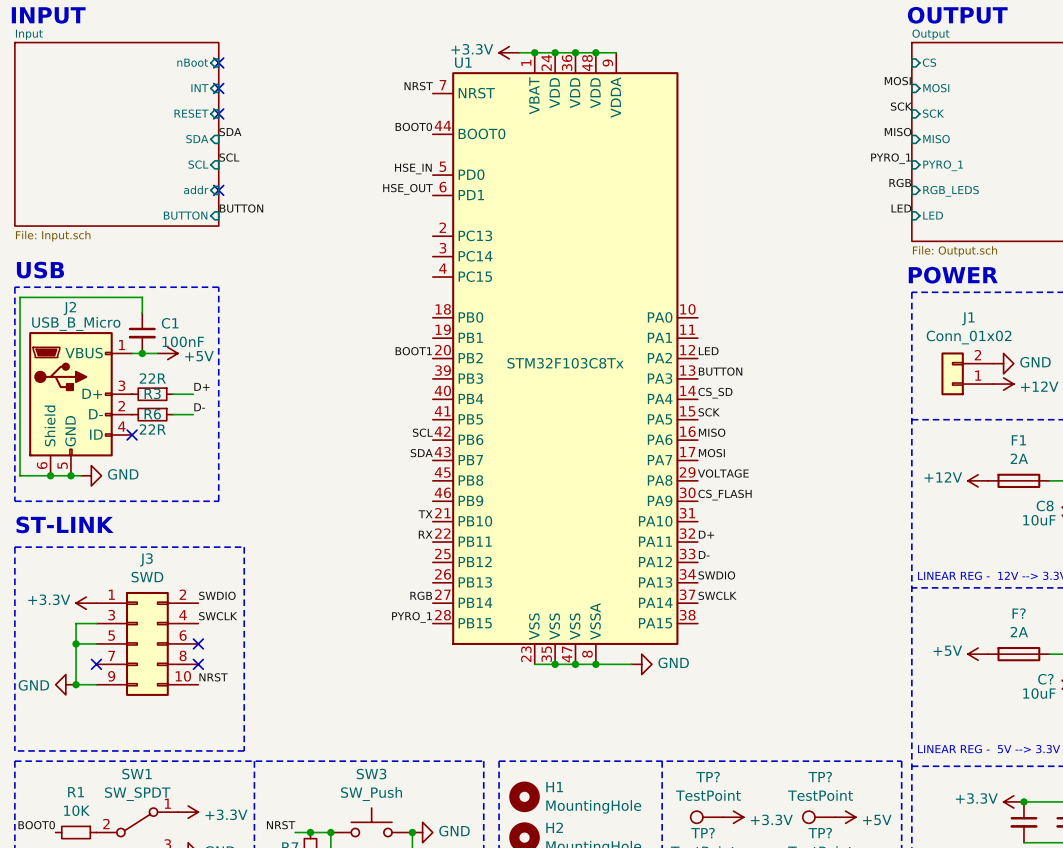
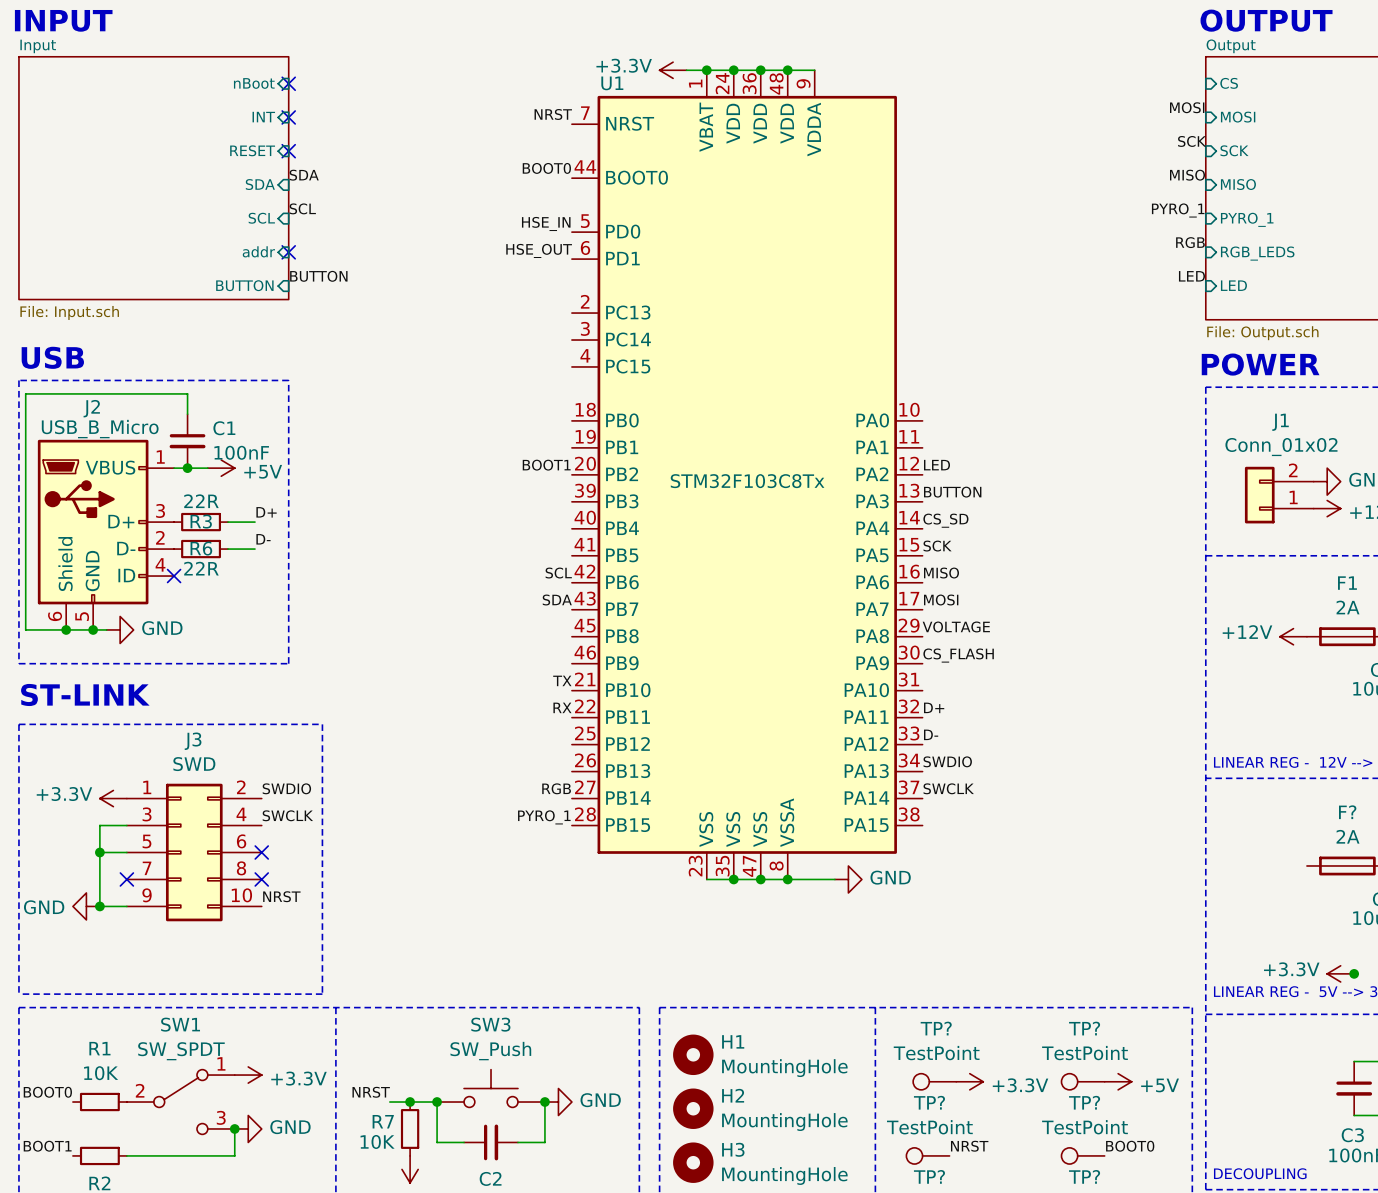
power symbol: +5V (978, 654) -> none
junction: none -> (1354, 973)
power symbol position: +3.3V (1013, 801) -> +3.3V (1340, 973)
junction: (1023, 801) -> none

